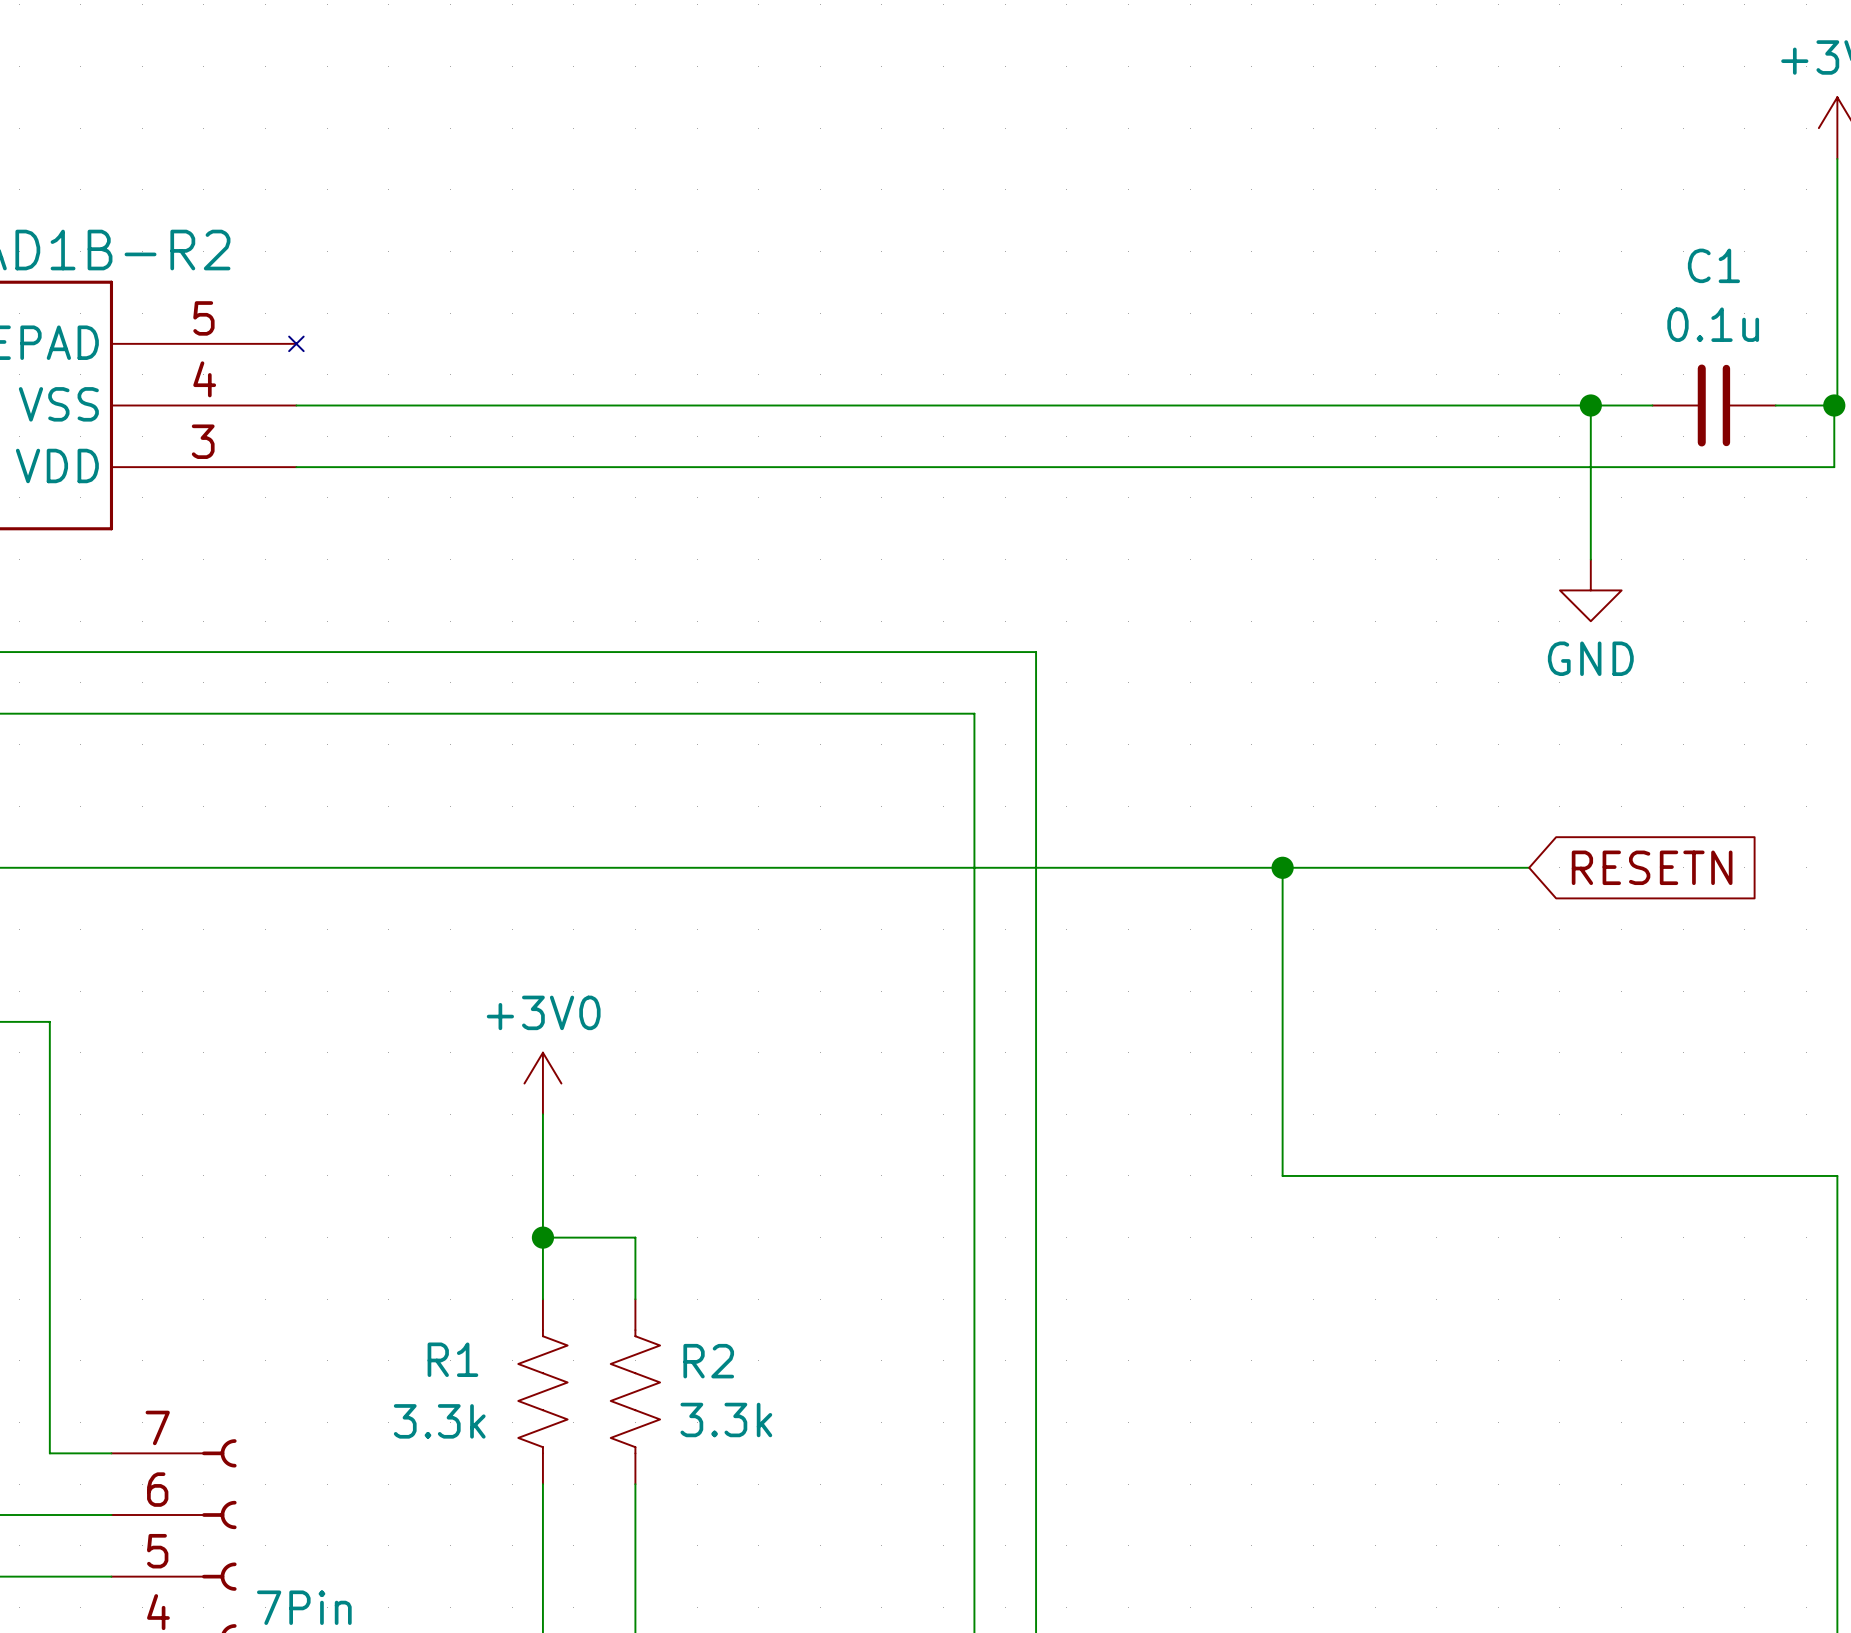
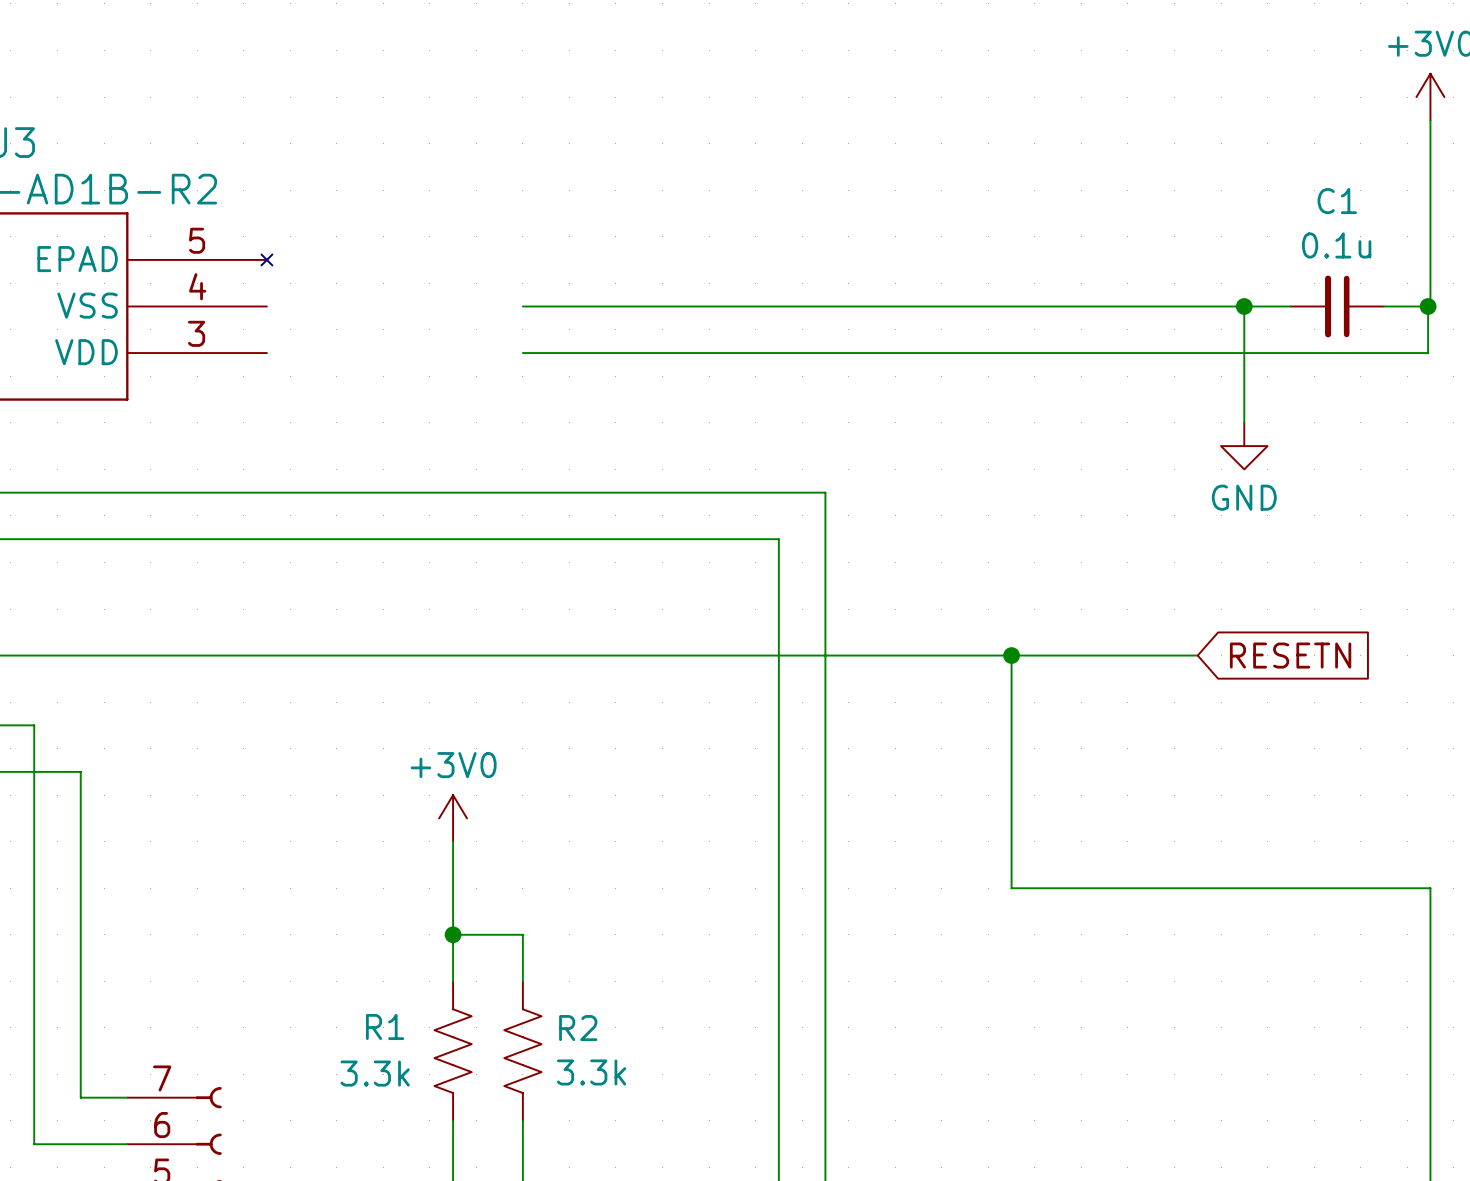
wire: (296, 405) (635, 405) -> none
wire: (296, 467) (635, 467) -> none

